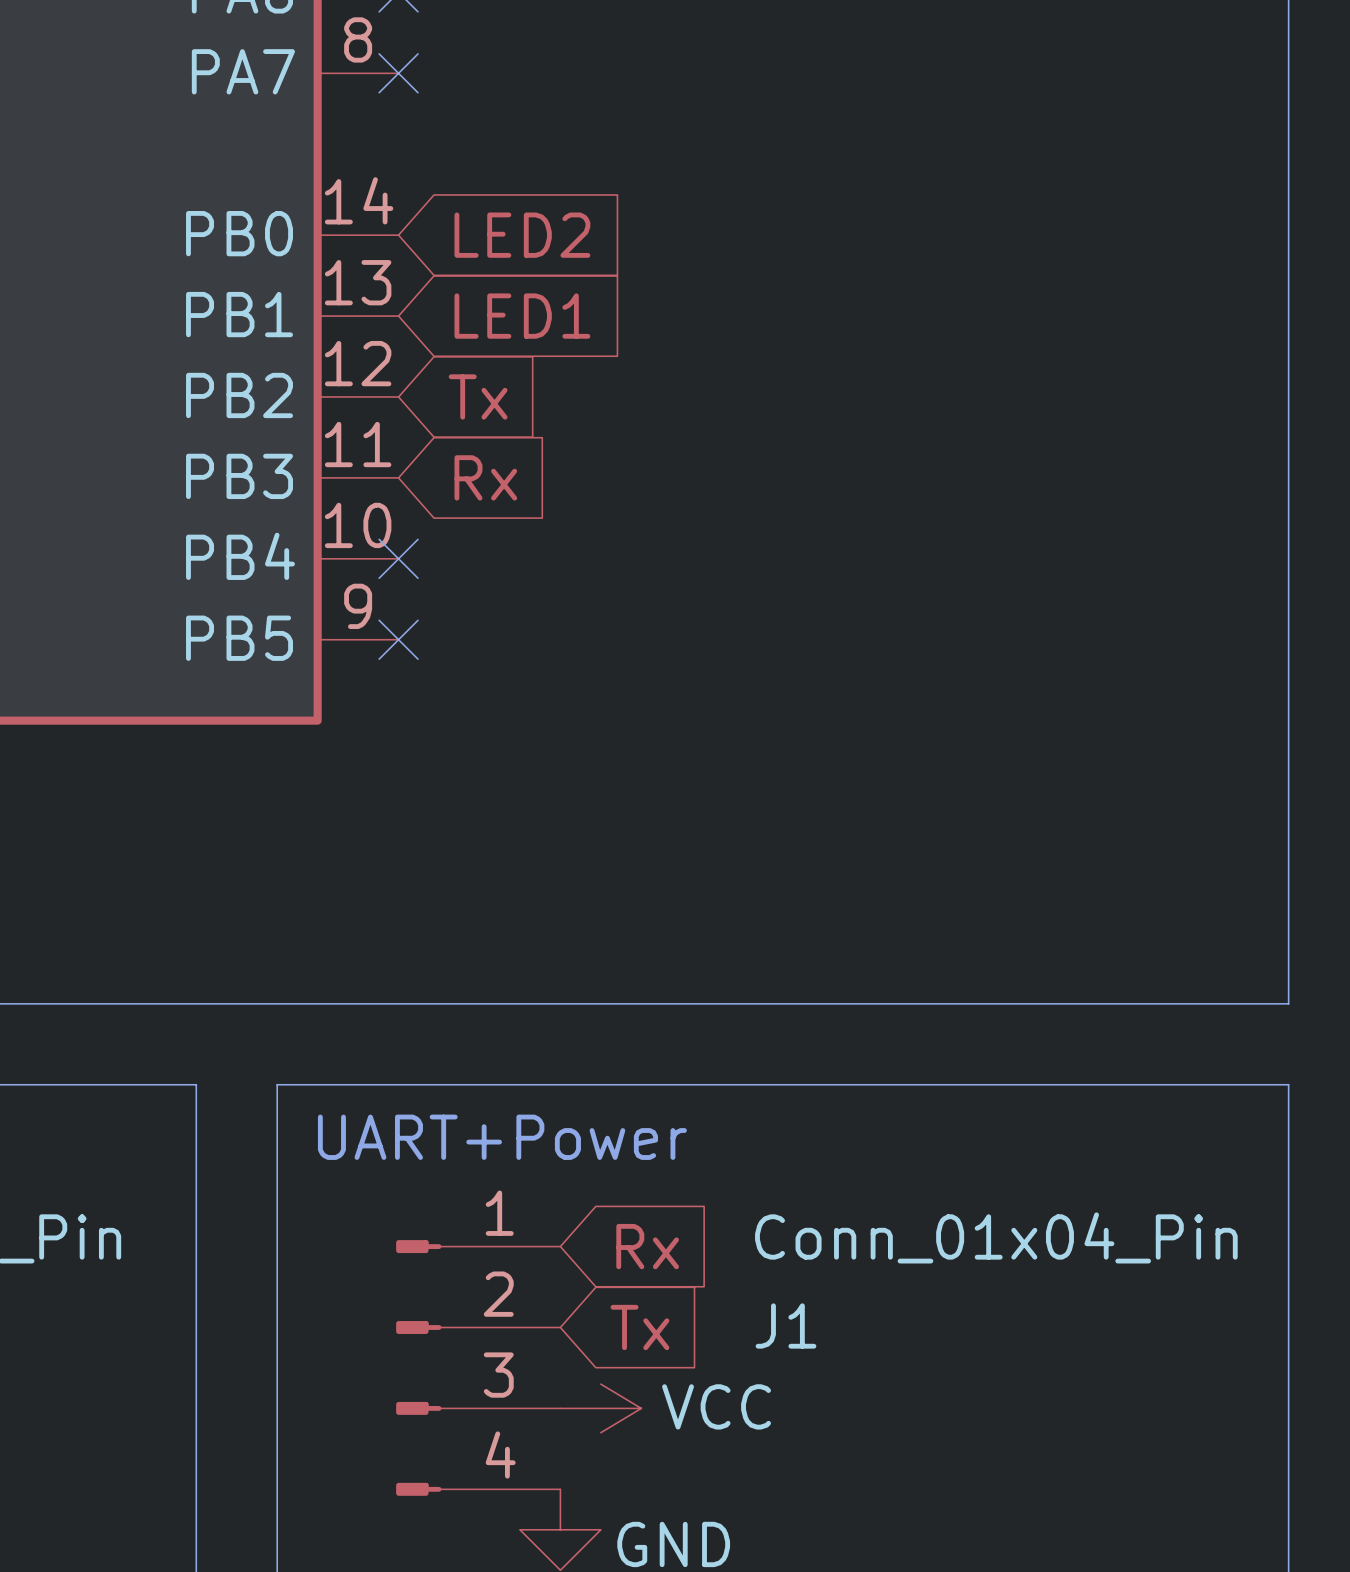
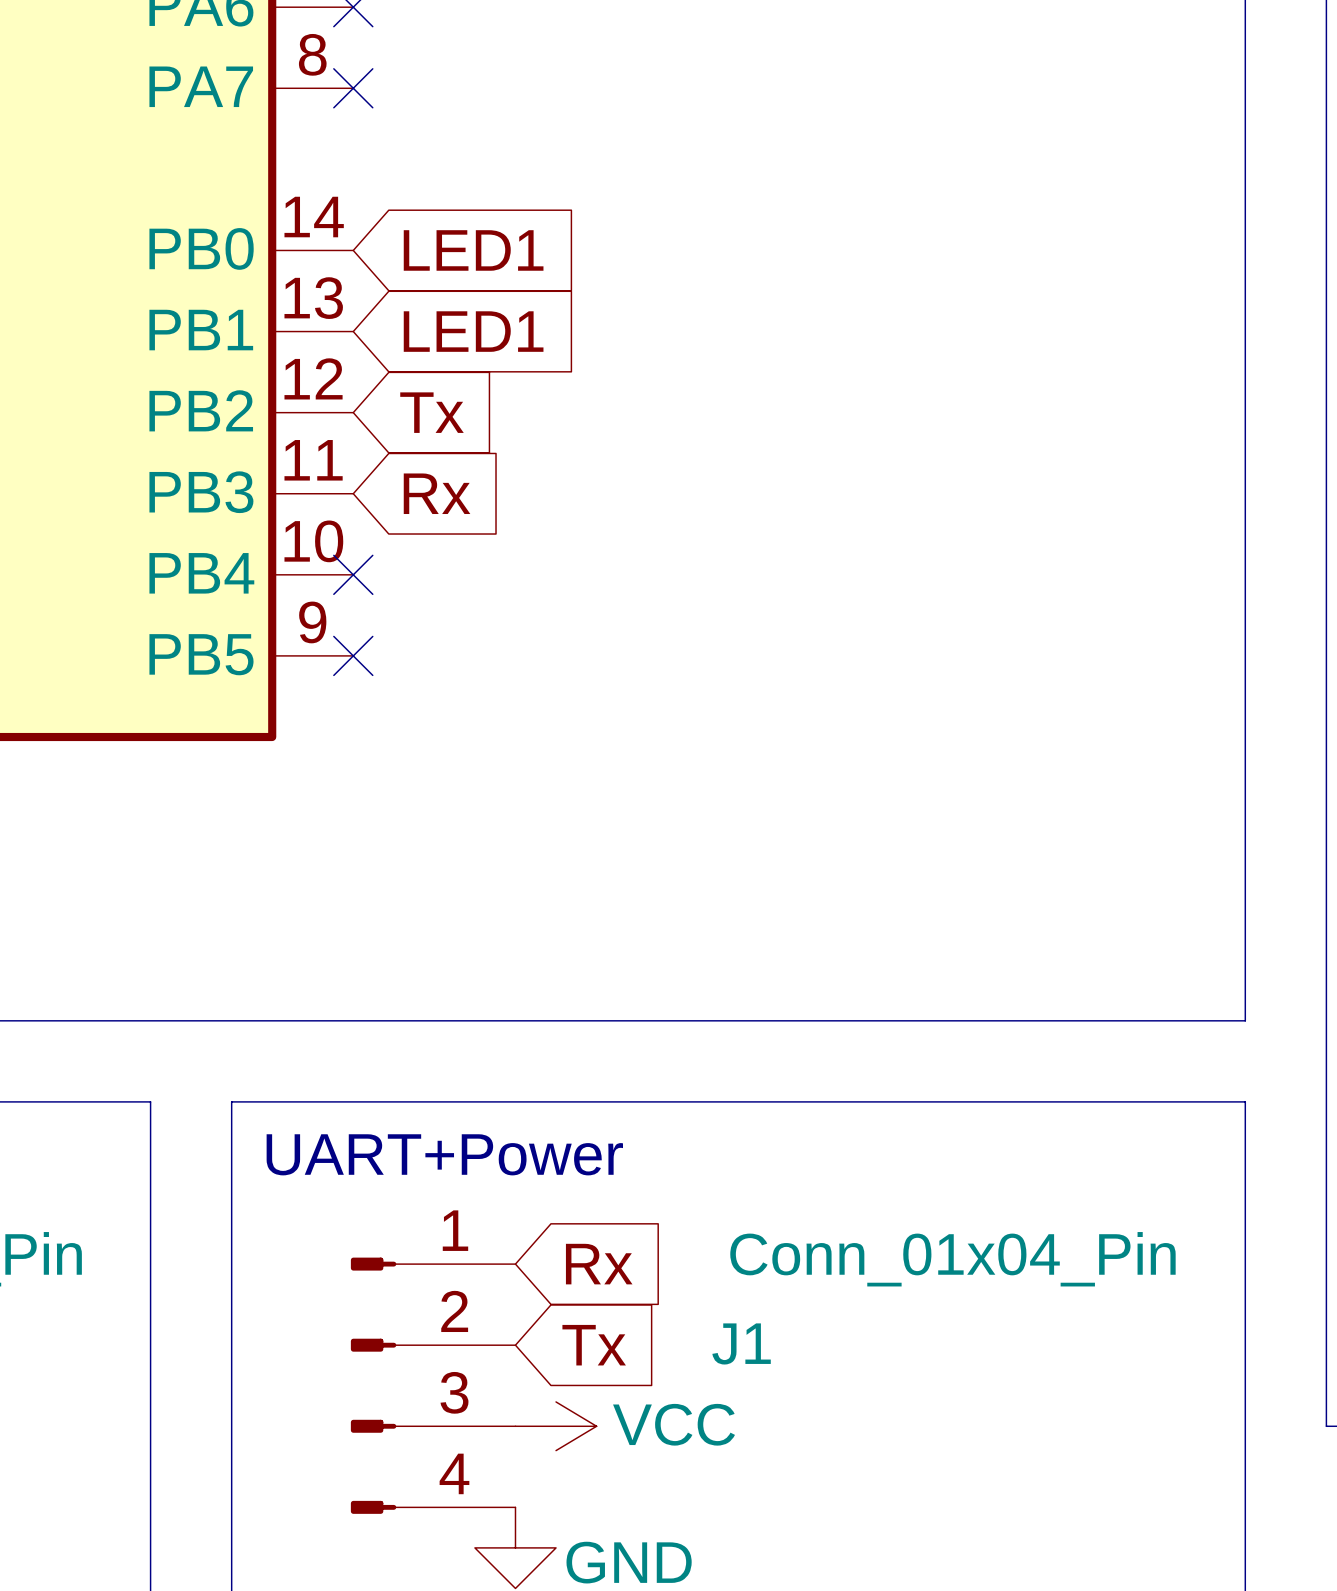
global label: LED2 (522, 235) -> LED1 (473, 250)

